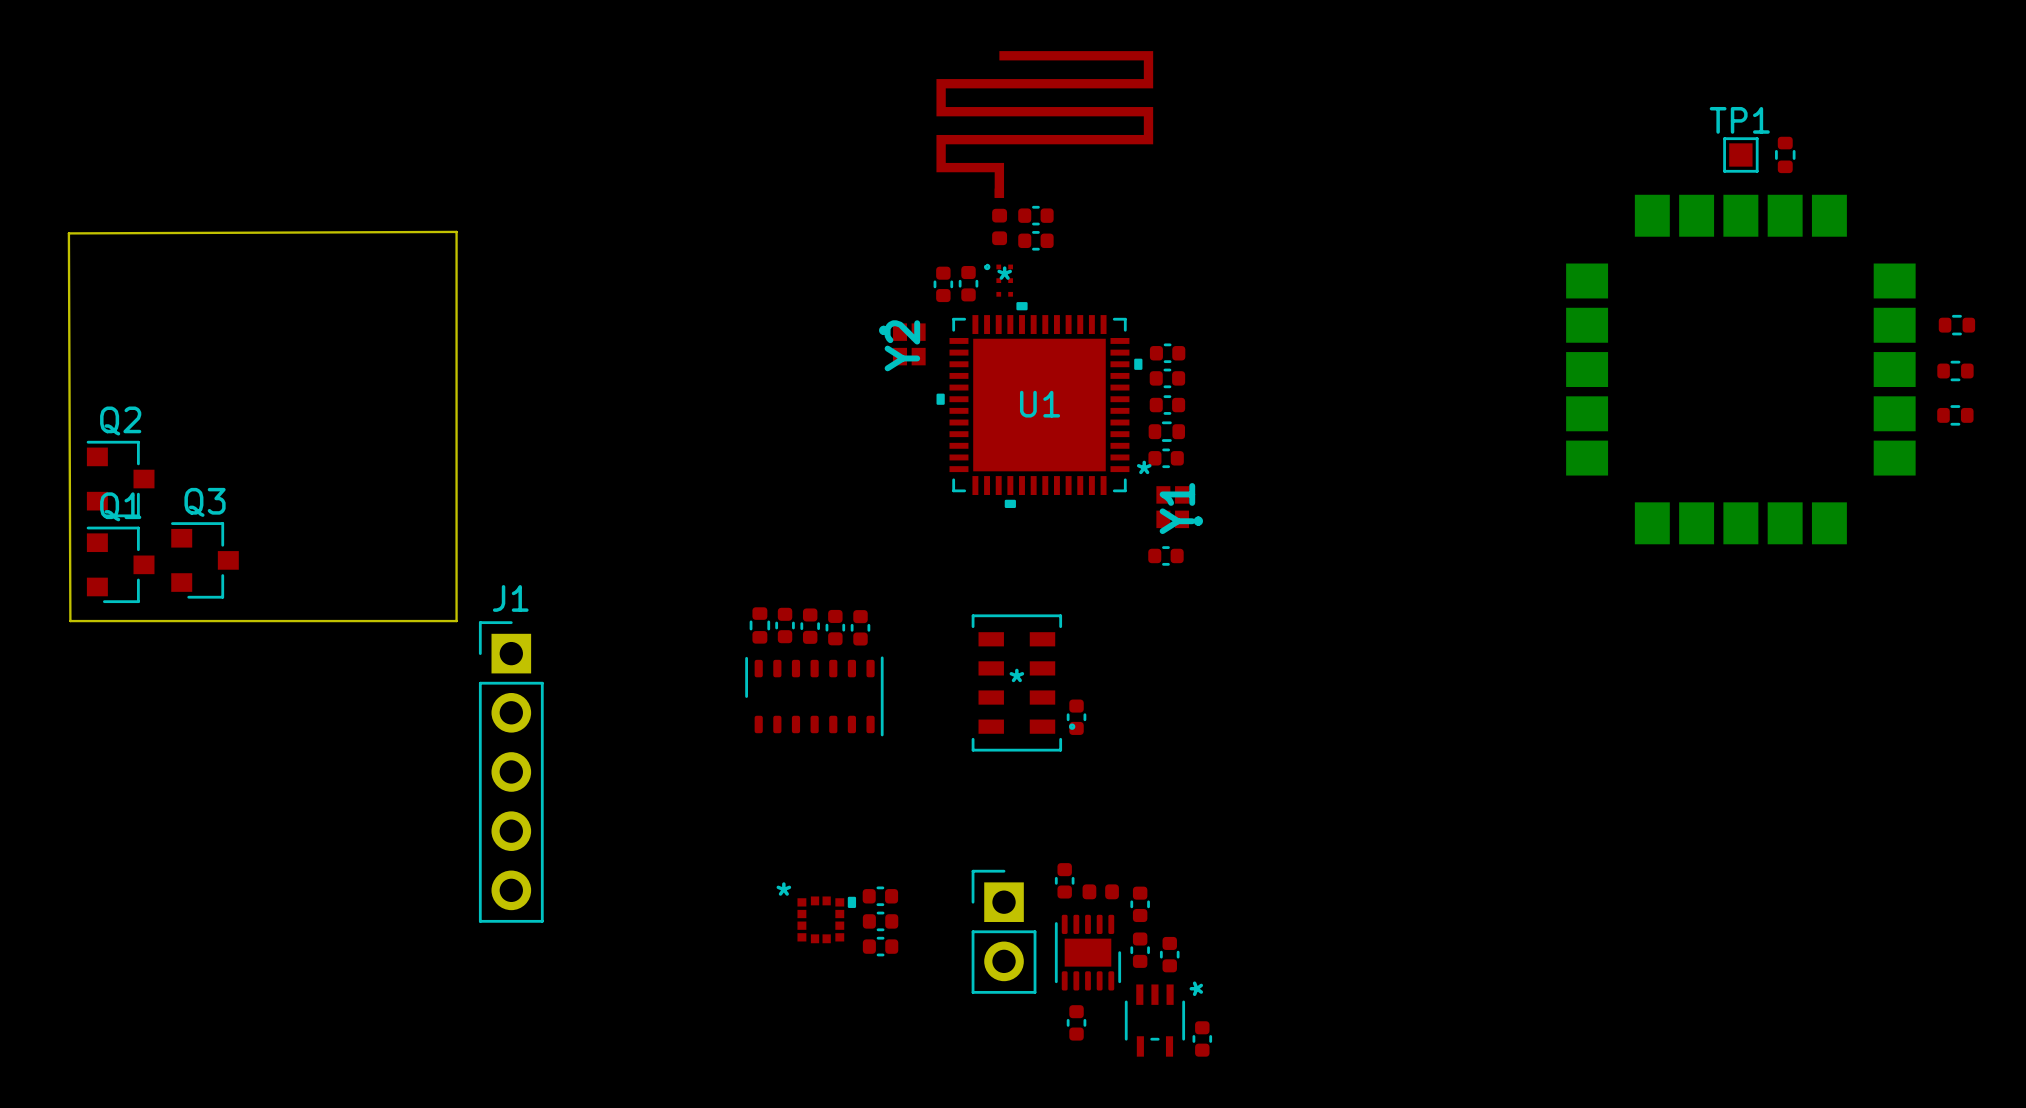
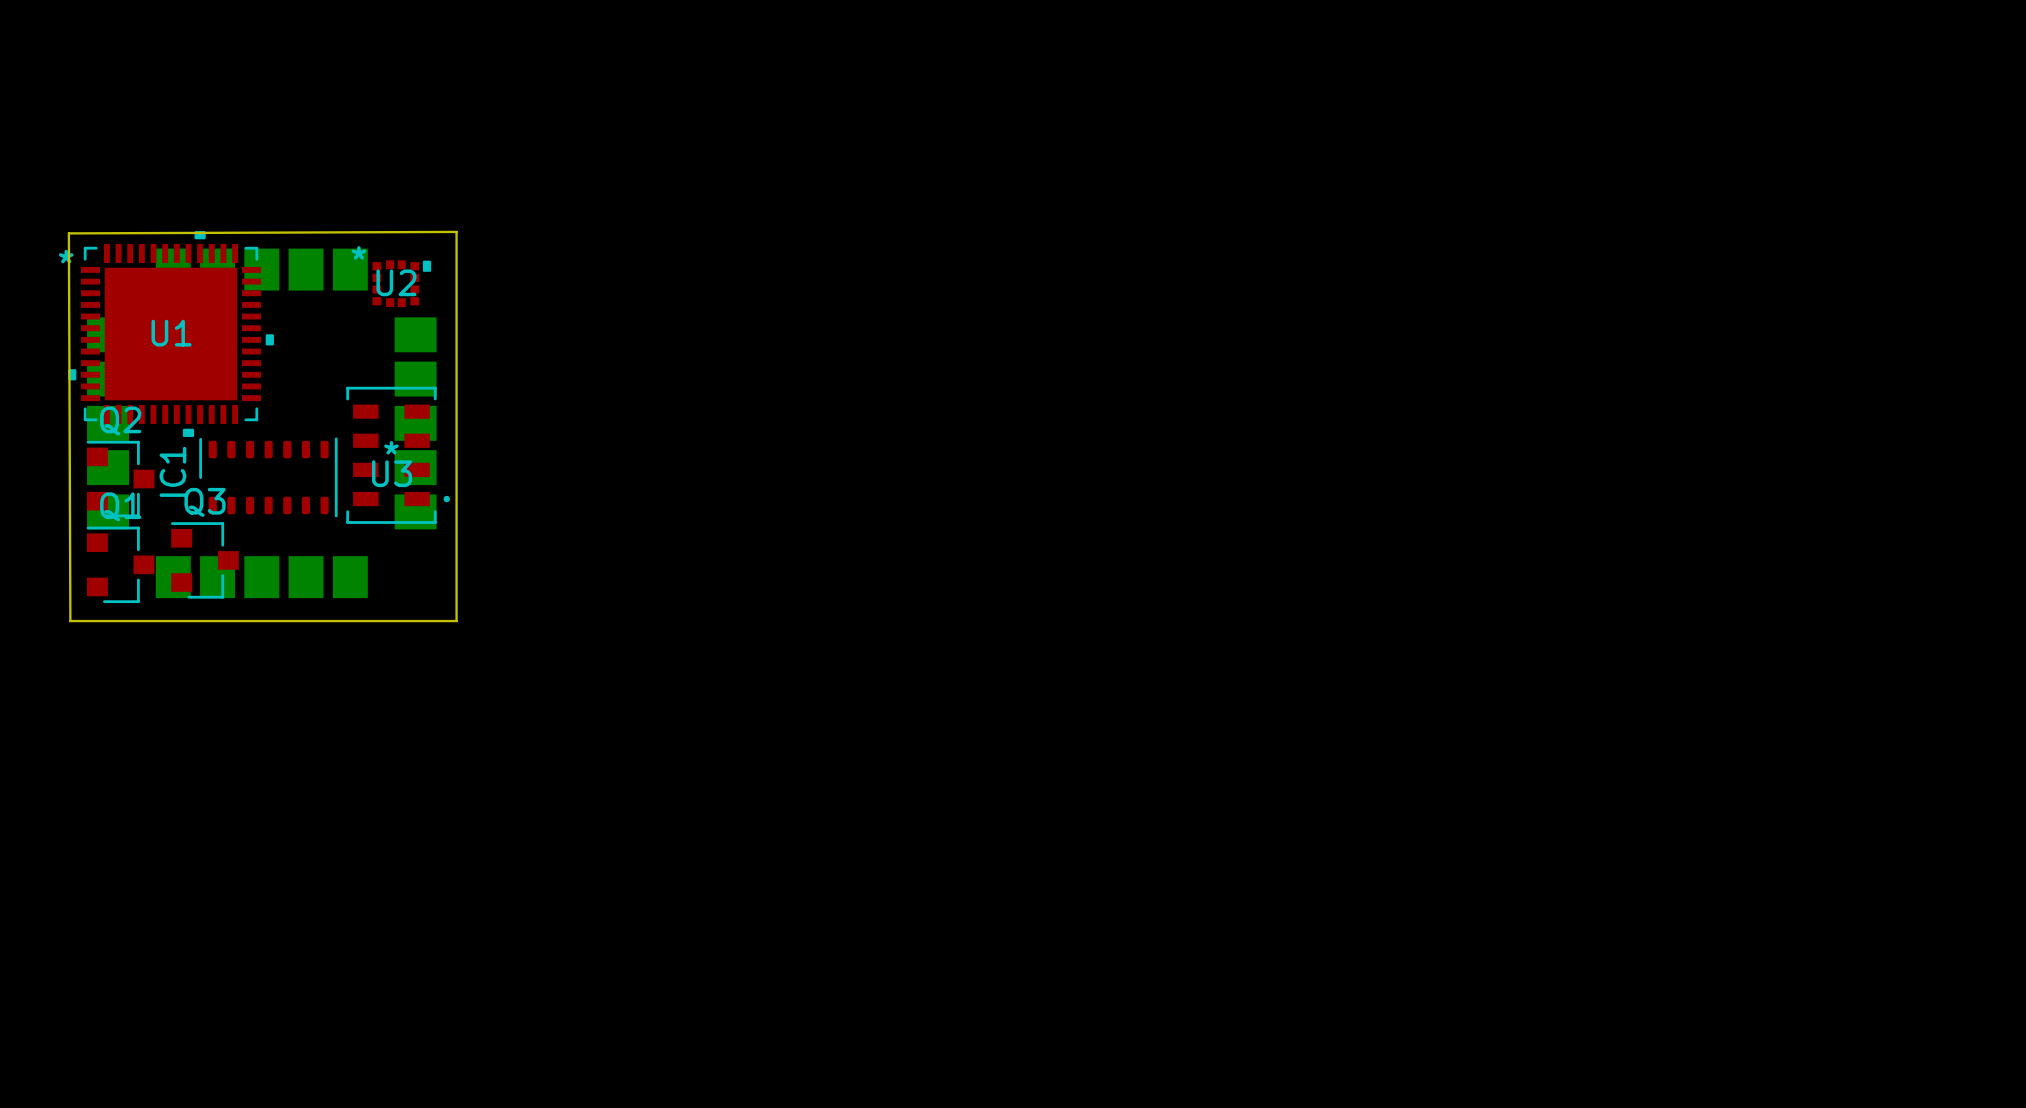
part: (1044, 124) -> none
TP1: (1740, 154) -> none
part: (1785, 154) -> none
part: (1035, 215) -> none
part: (999, 226) -> none
part: (1035, 240) -> none
part: (998, 280) -> none
U2: none -> (401, 283)
part: (968, 283) -> none
part: (943, 284) -> none
part: (1956, 325) -> none
Y2: (902, 344) -> none
part: (1167, 353) -> none
part: (1740, 369) -> none
part: (1955, 371) -> none
part: (1167, 378) -> none
U1 rotation: 0° (1039, 405) -> 180° (171, 334)
U1 position: (1039, 405) -> (171, 334)
part: (1167, 405) -> none
part: (1955, 415) -> none
part: none -> (261, 423)
part: (1166, 431) -> none
U3: none -> (398, 455)
part: (1166, 458) -> none
IC1: none -> (268, 477)
Y1: (1179, 507) -> none
part: (1165, 555) -> none
part: (759, 625) -> none
part: (785, 625) -> none
part: (810, 626) -> none
part: (835, 627) -> none
part: (860, 627) -> none
part: (1023, 682) -> none
part: (814, 696) -> none
part: (1076, 717) -> none
J1: (511, 771) -> none
part: (1064, 880) -> none
part: (1100, 891) -> none
part: (880, 896) -> none
part: (1140, 904) -> none
part: (826, 919) -> none
part: (880, 921) -> none
part: (1004, 931) -> none
part: (880, 946) -> none
part: (1140, 950) -> none
part: (1087, 952) -> none
part: (1169, 954) -> none
part: (1154, 1020) -> none
part: (1076, 1022) -> none
part: (1202, 1038) -> none

